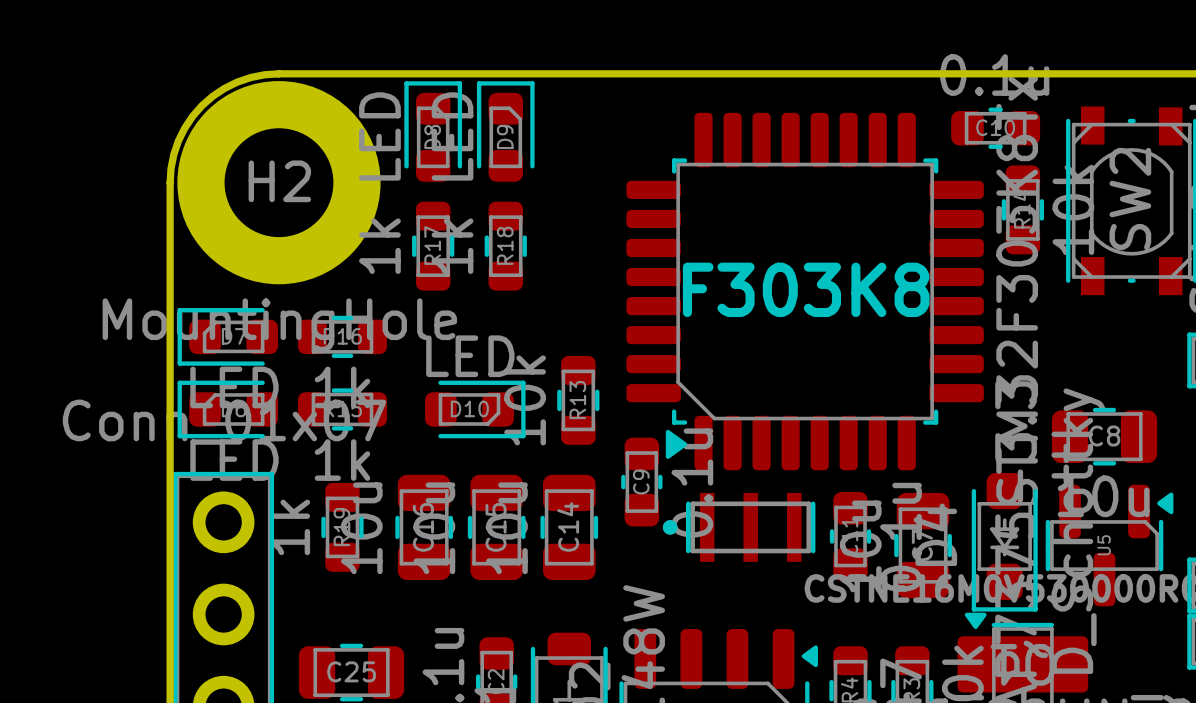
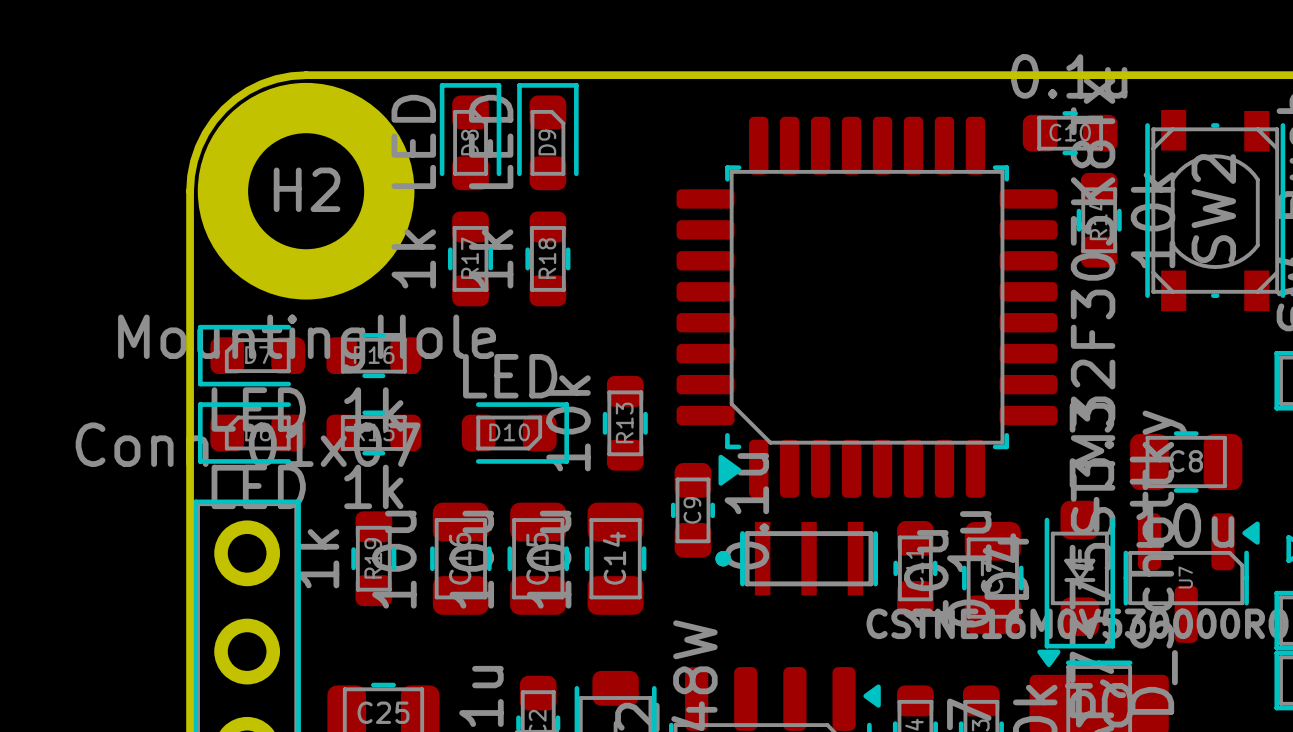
text: F303K8 (806, 289) -> none
U5 name: U5 (1104, 545) -> U7 (1185, 577)

